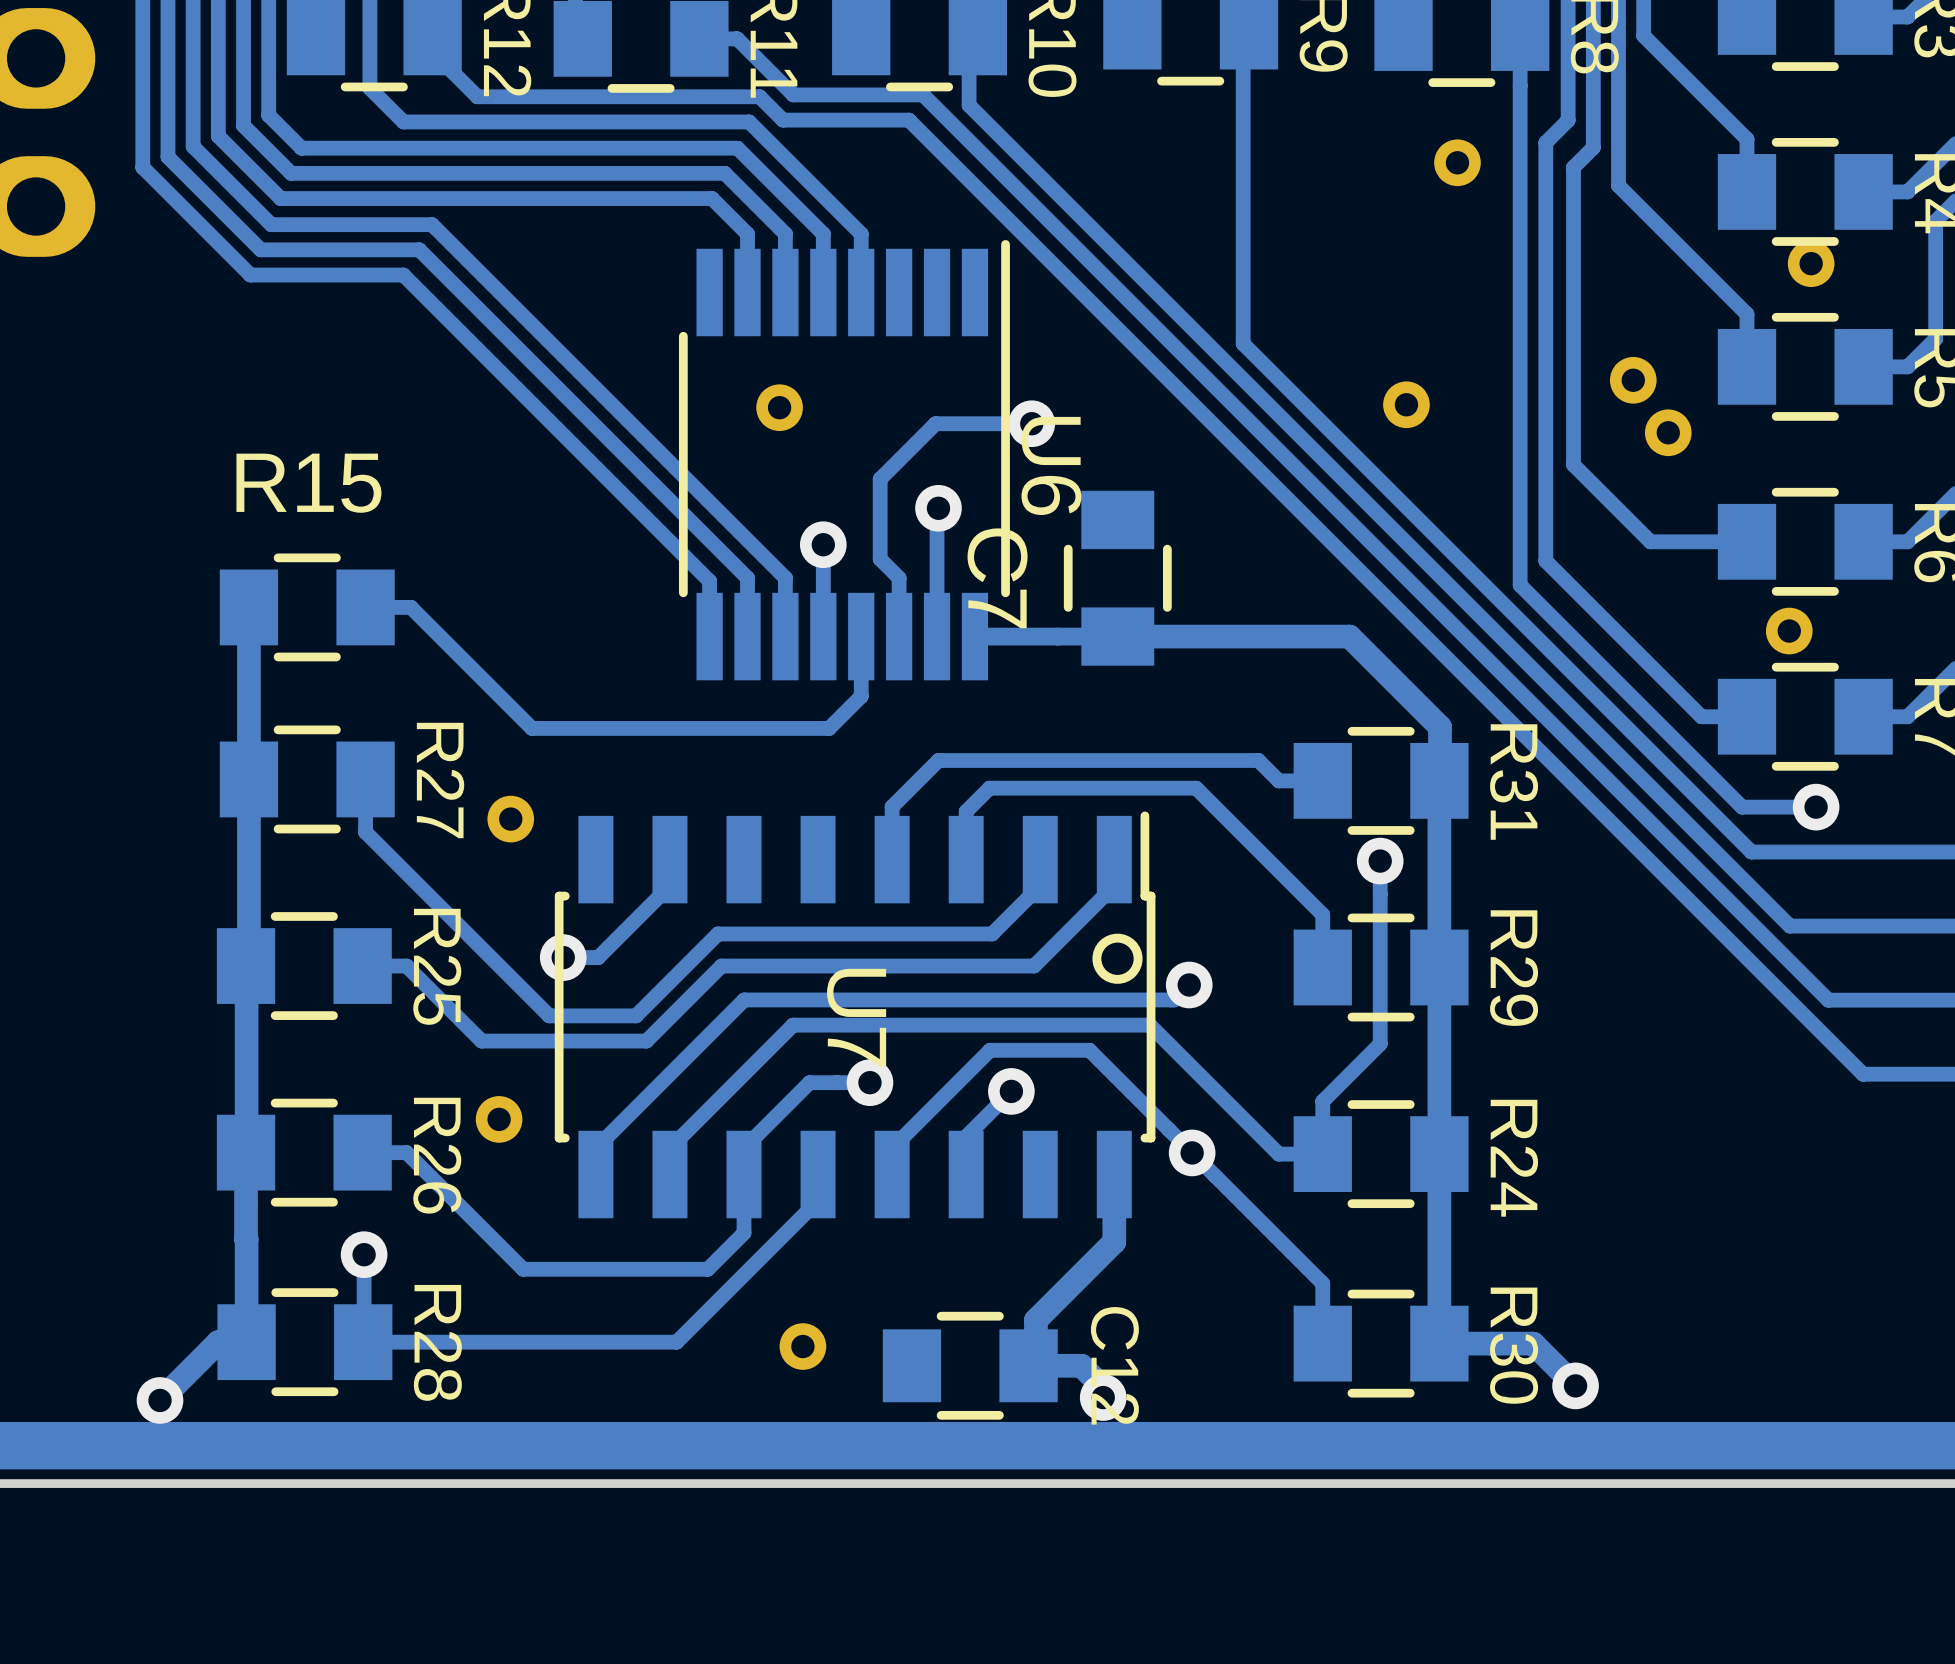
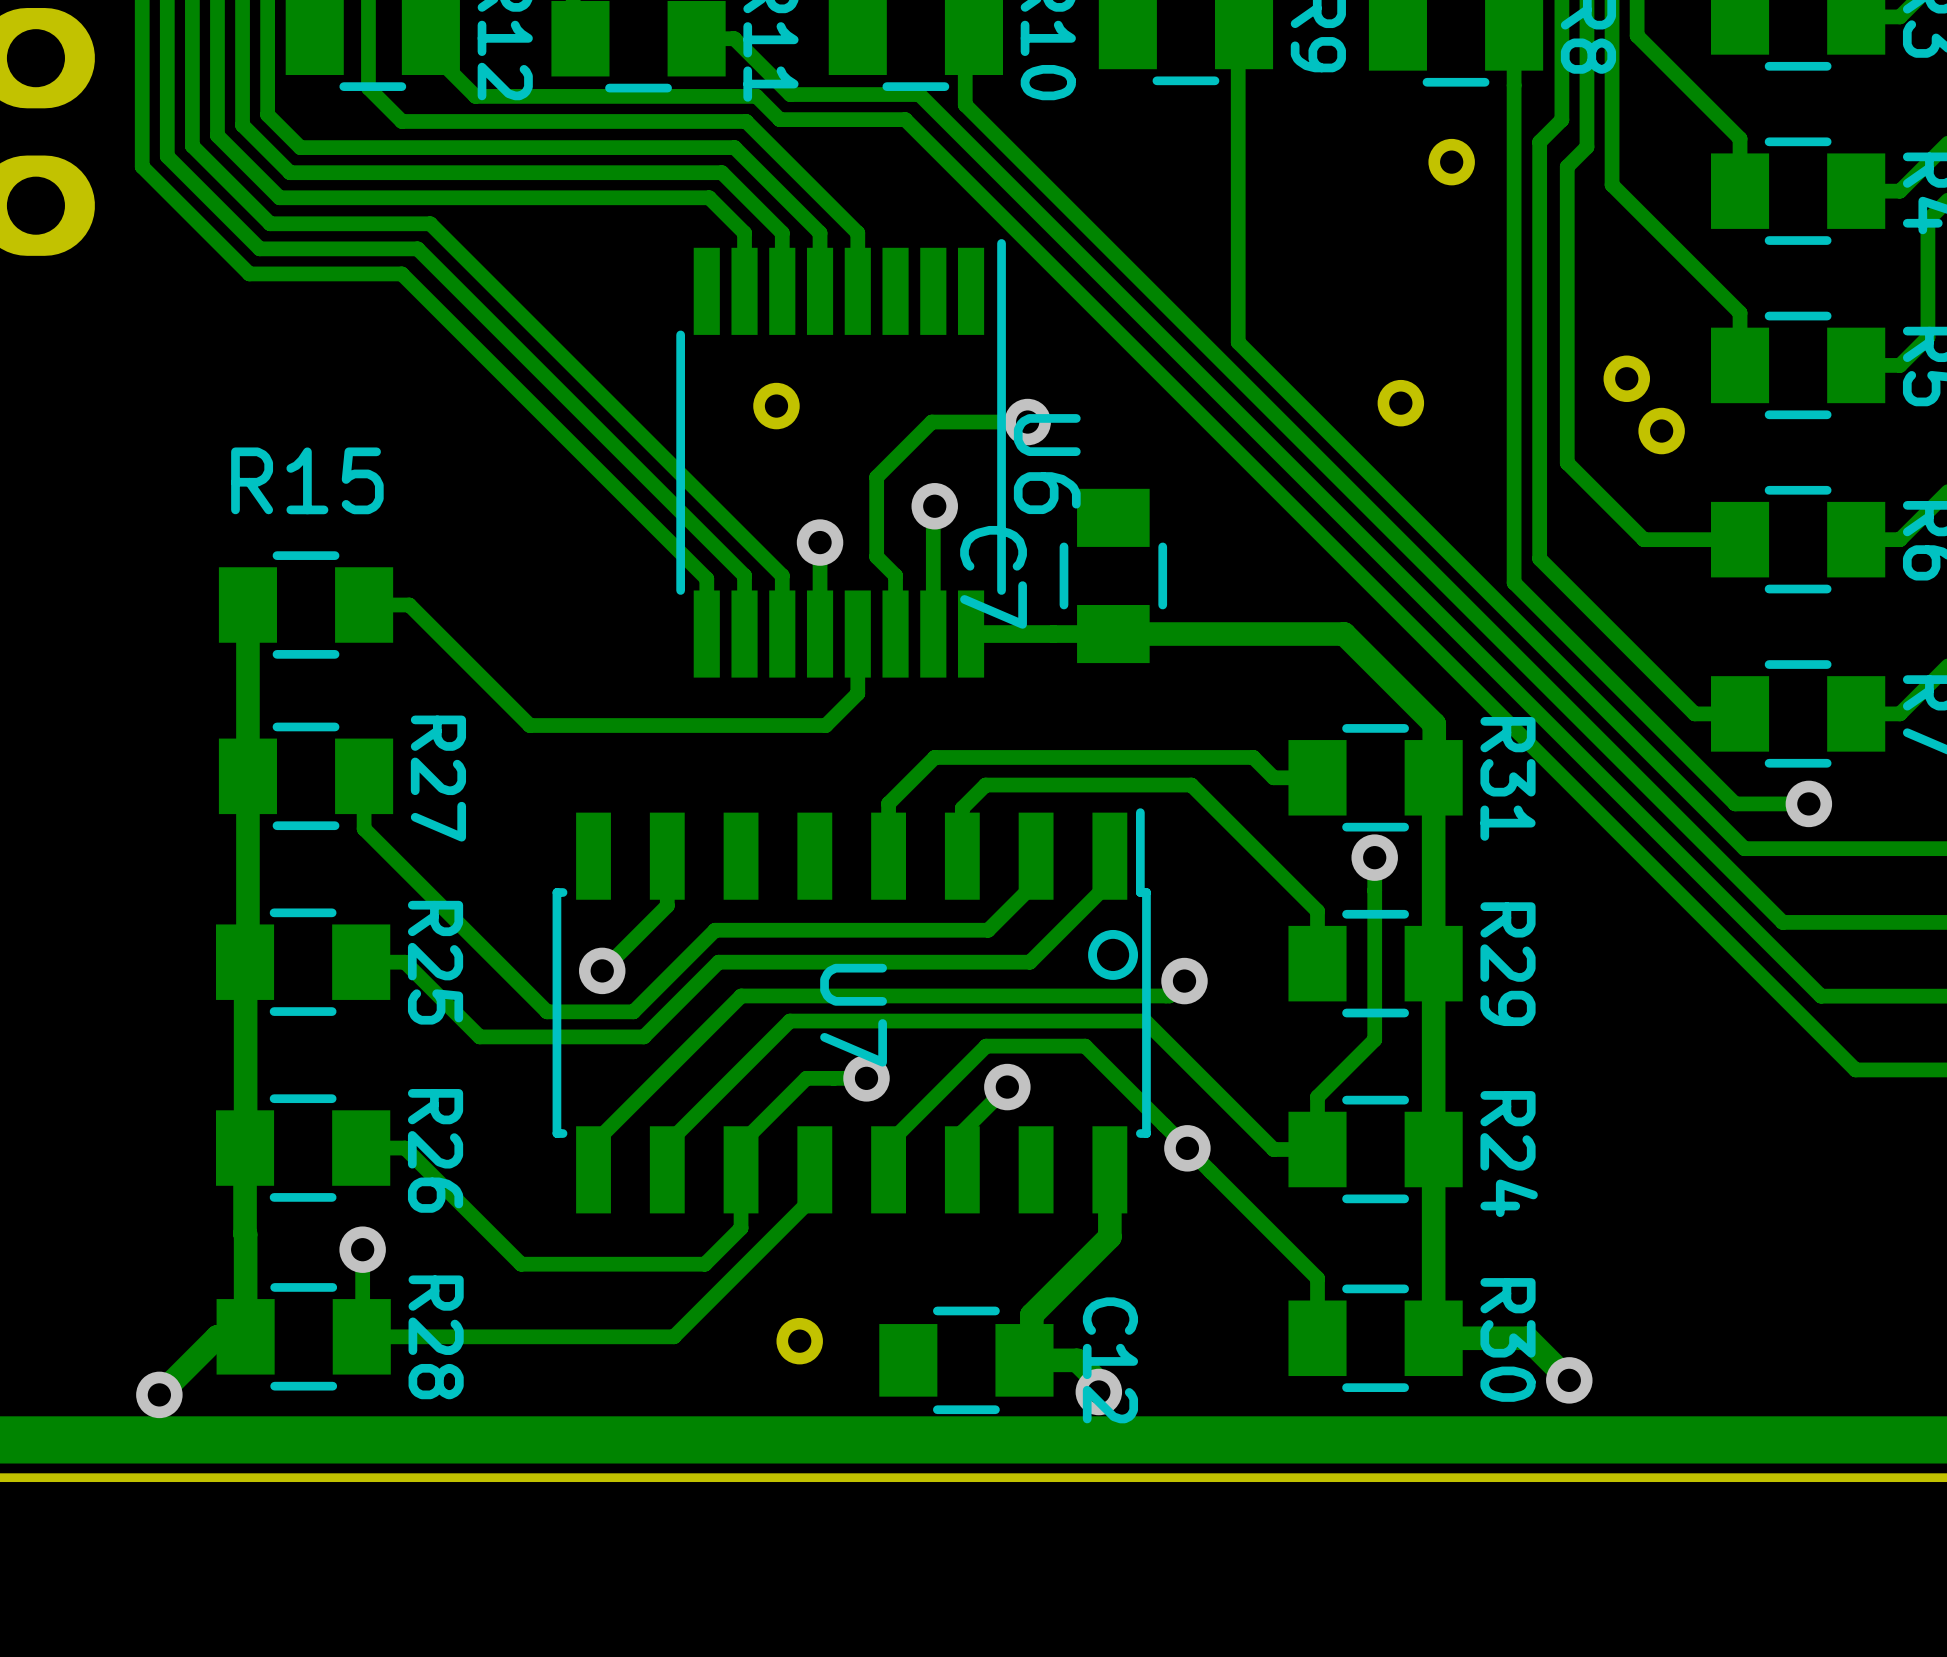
part: (1811, 263) -> none
part: (1789, 631) -> none
part: (510, 819) -> none
track: (669, 885) (598, 957) (563, 957) -> (667, 882) (667, 905) (602, 970)
via position: (563, 957) -> (602, 970)
part: (499, 1119) -> none

